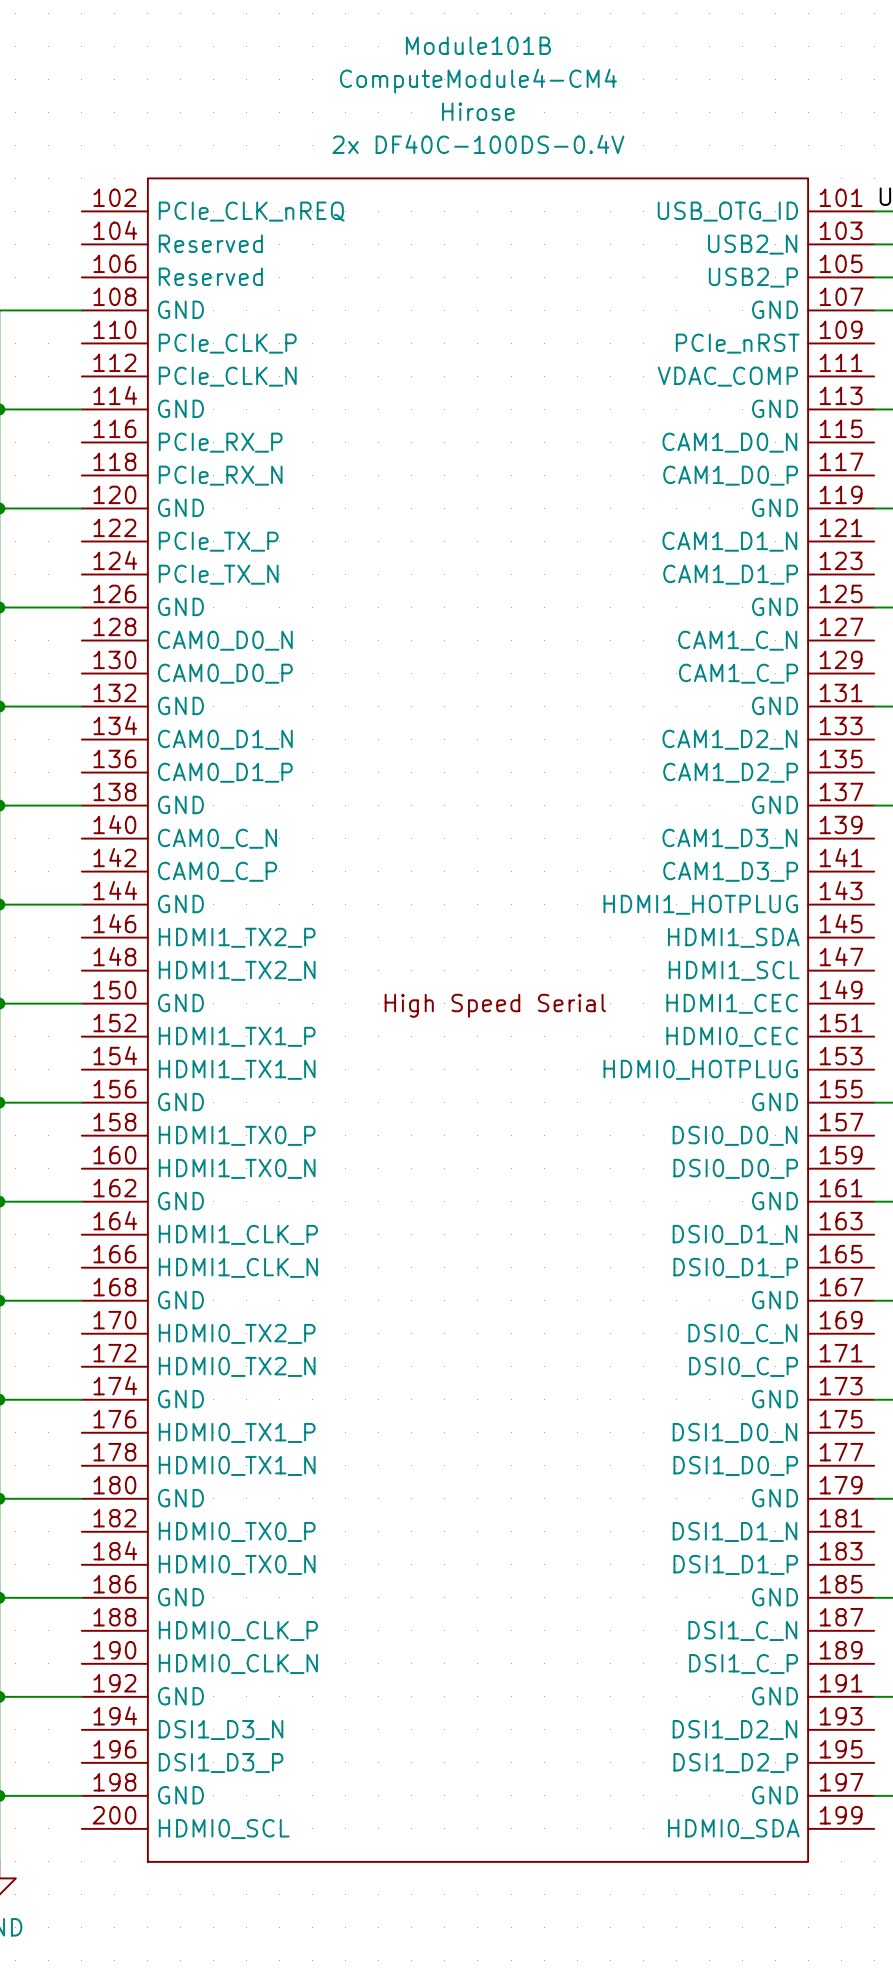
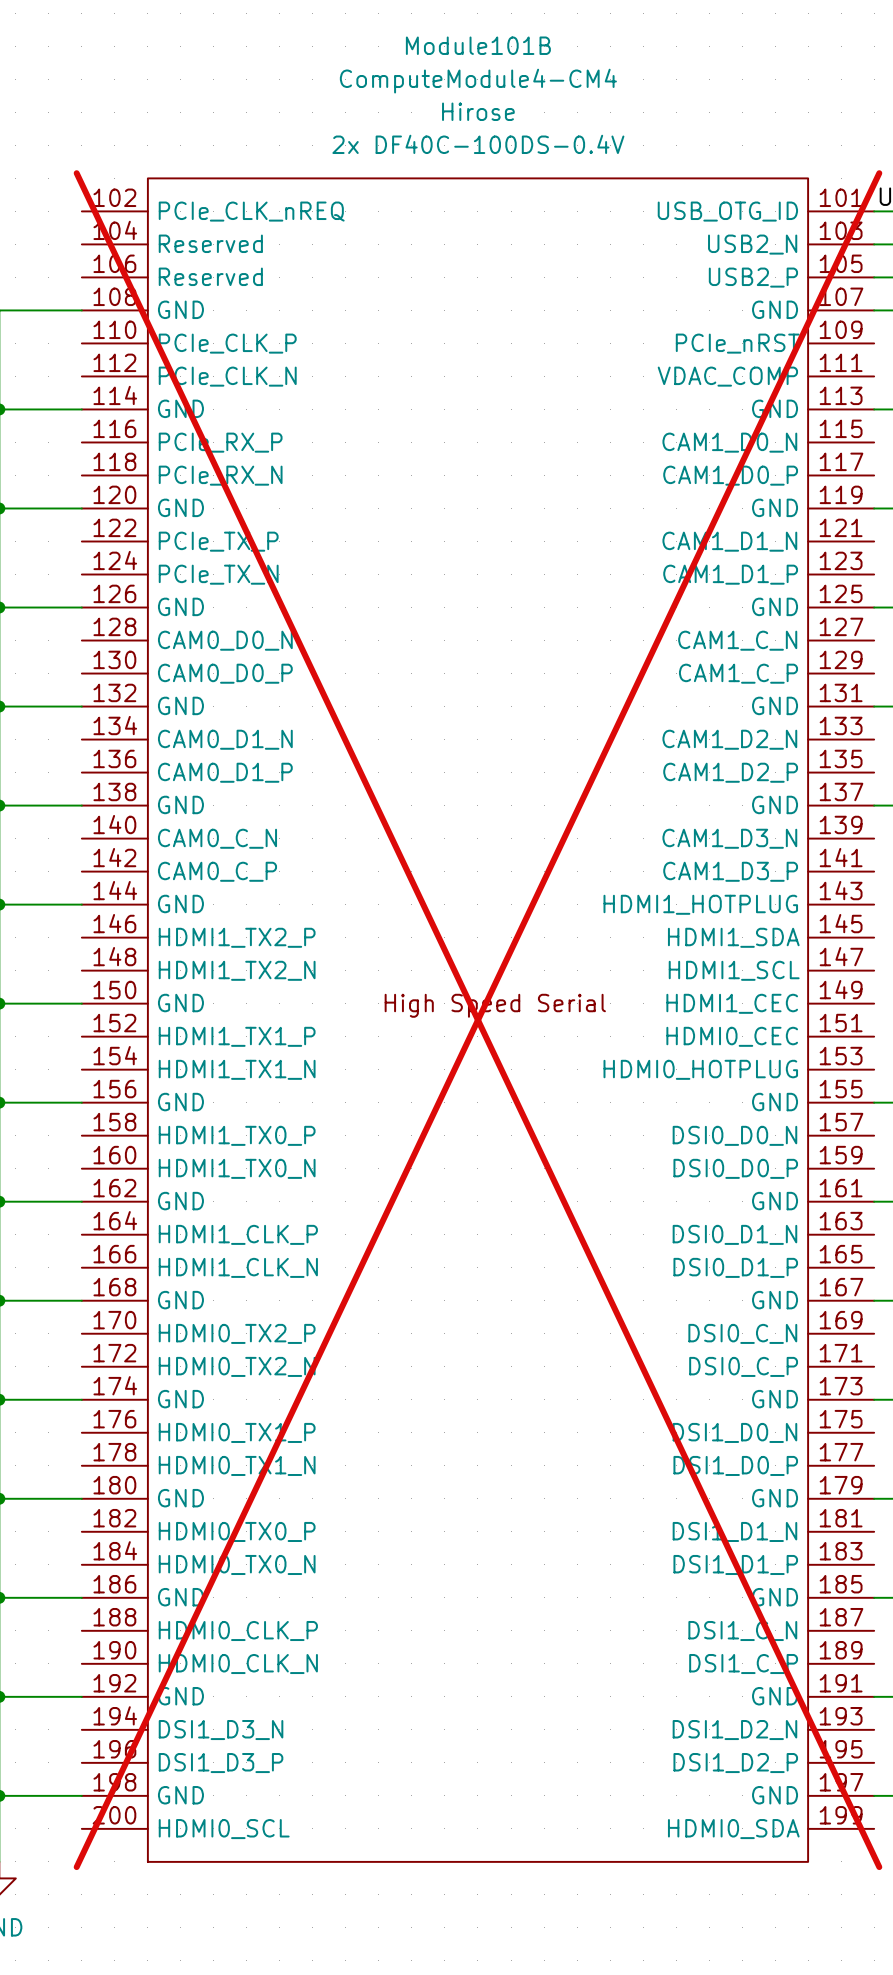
Module101B do-not-place cross: none -> (477, 1020)

